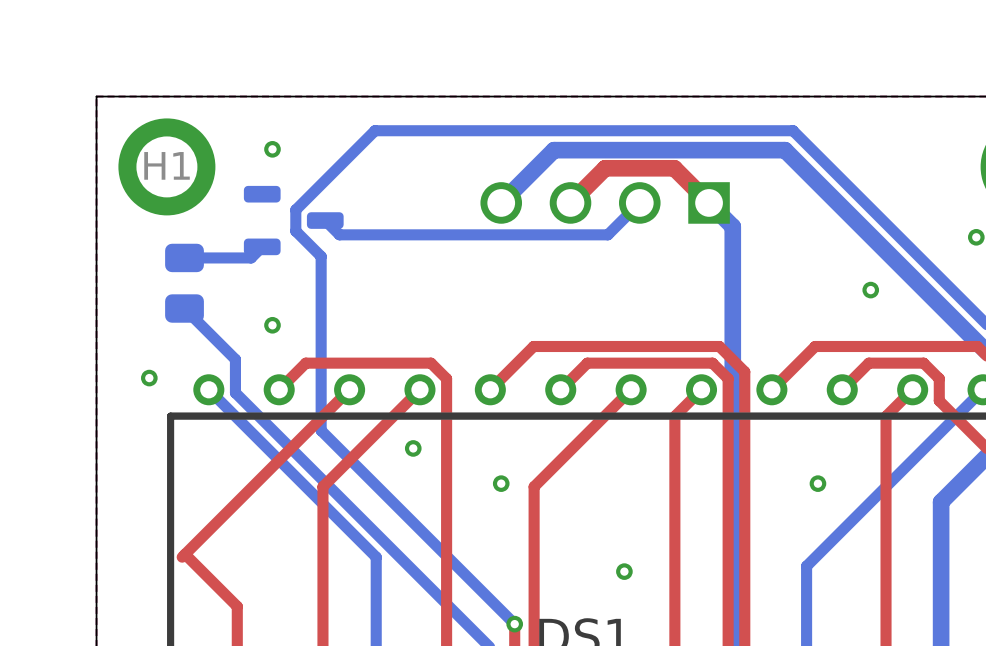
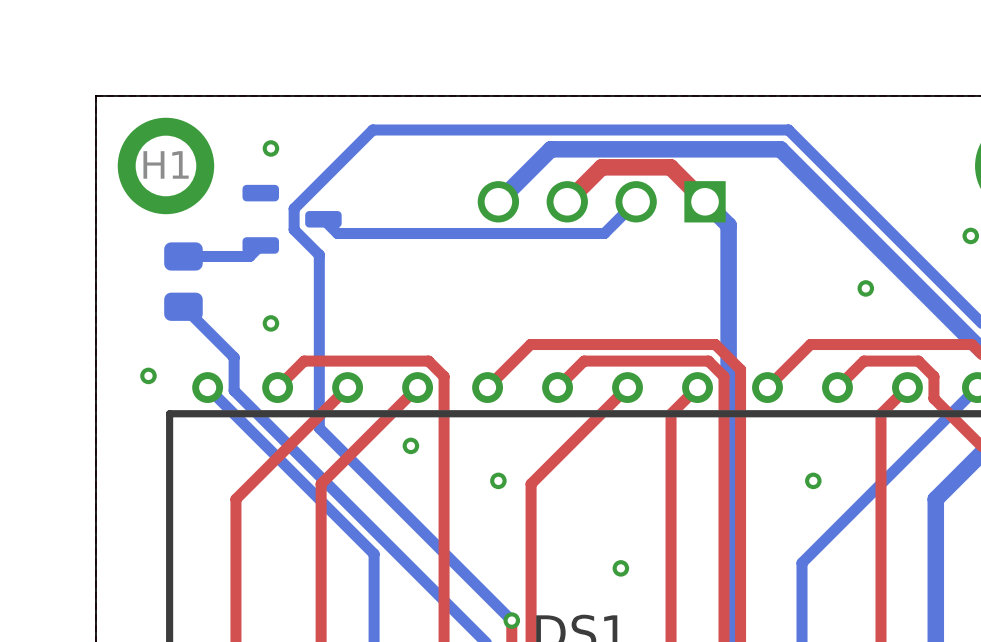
top track: (237, 502) (182, 557) -> none
top track: (185, 554) (237, 606) -> (235, 499) (235, 603)

